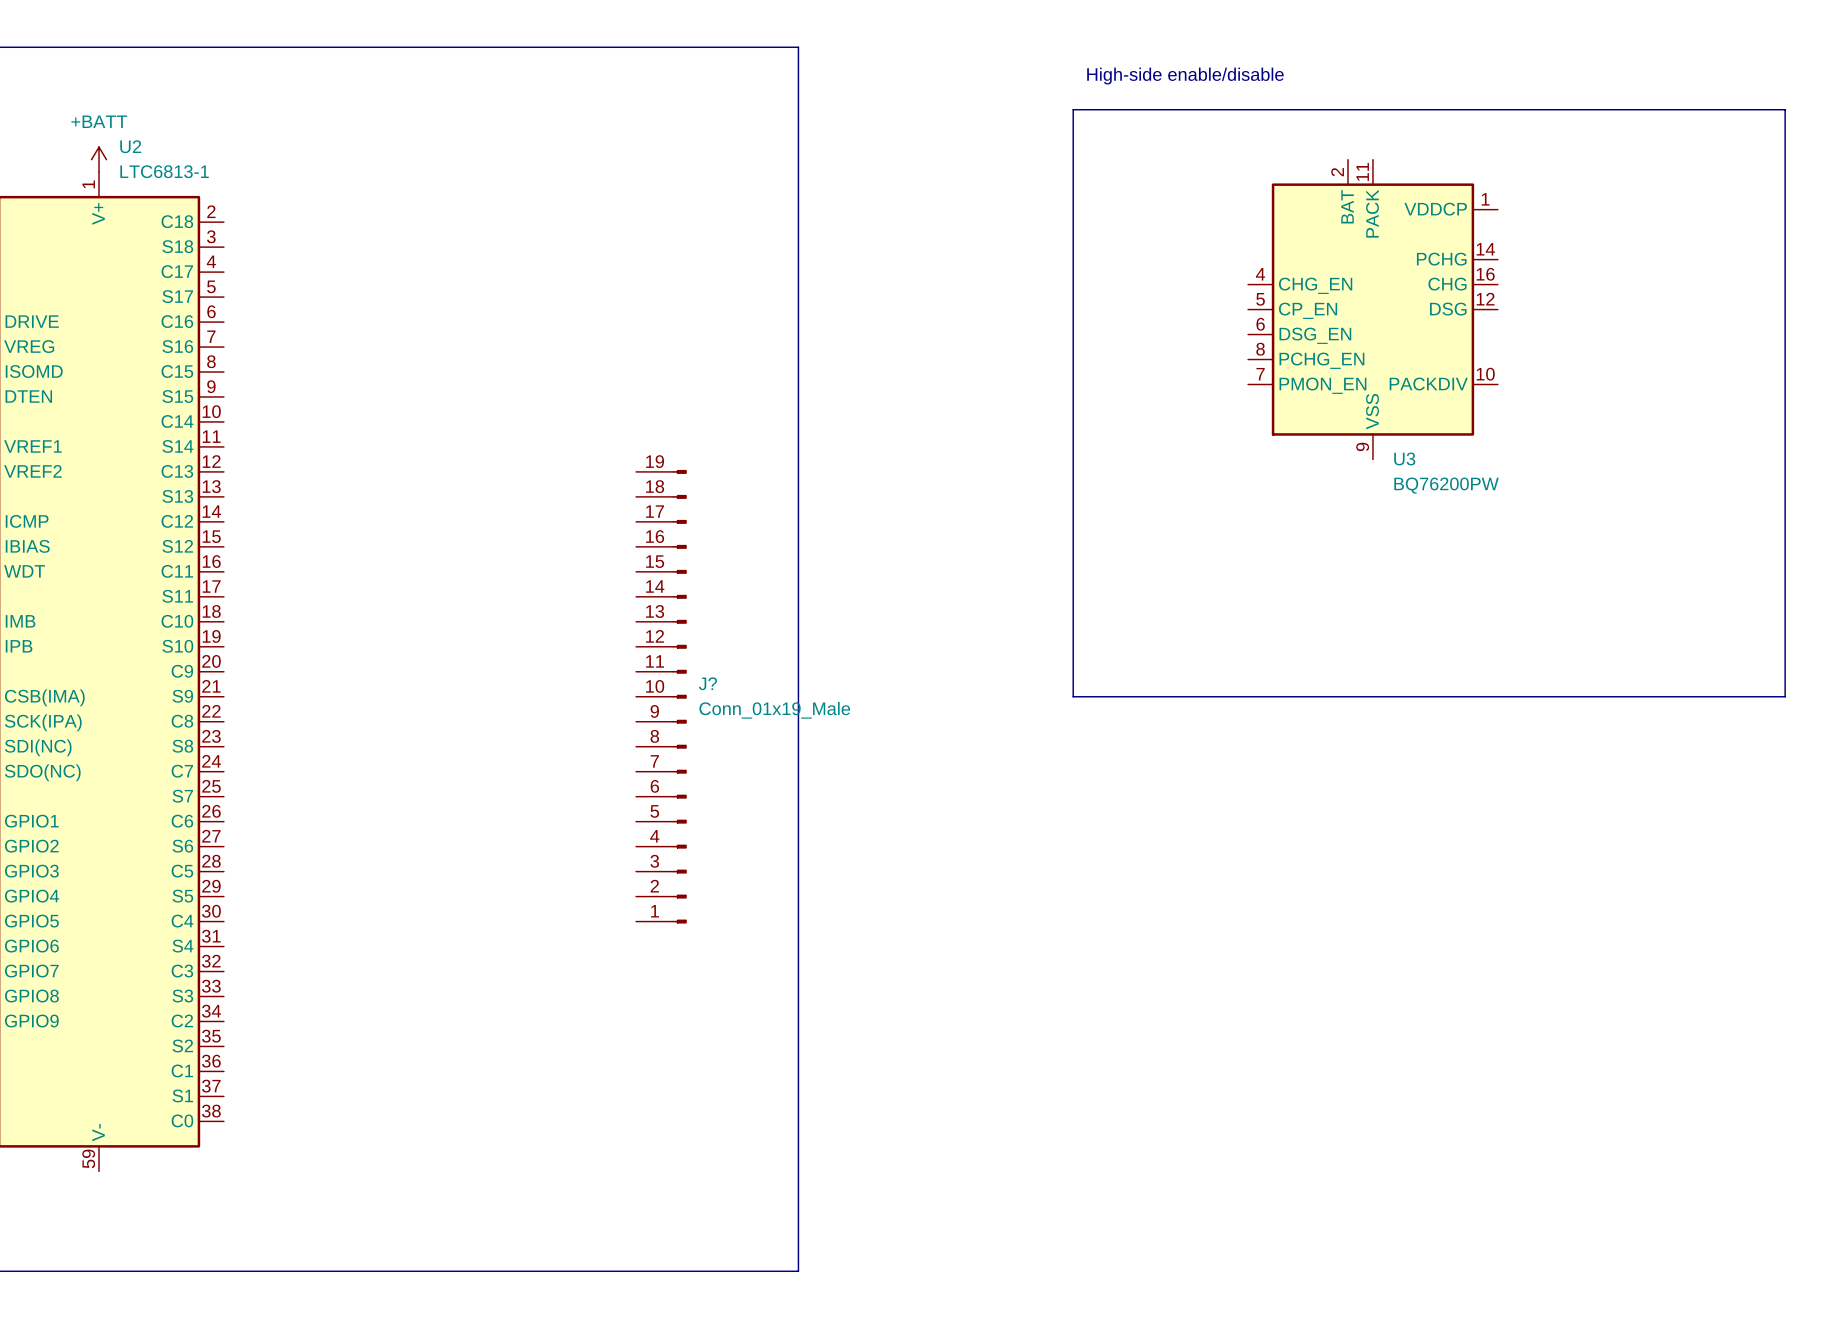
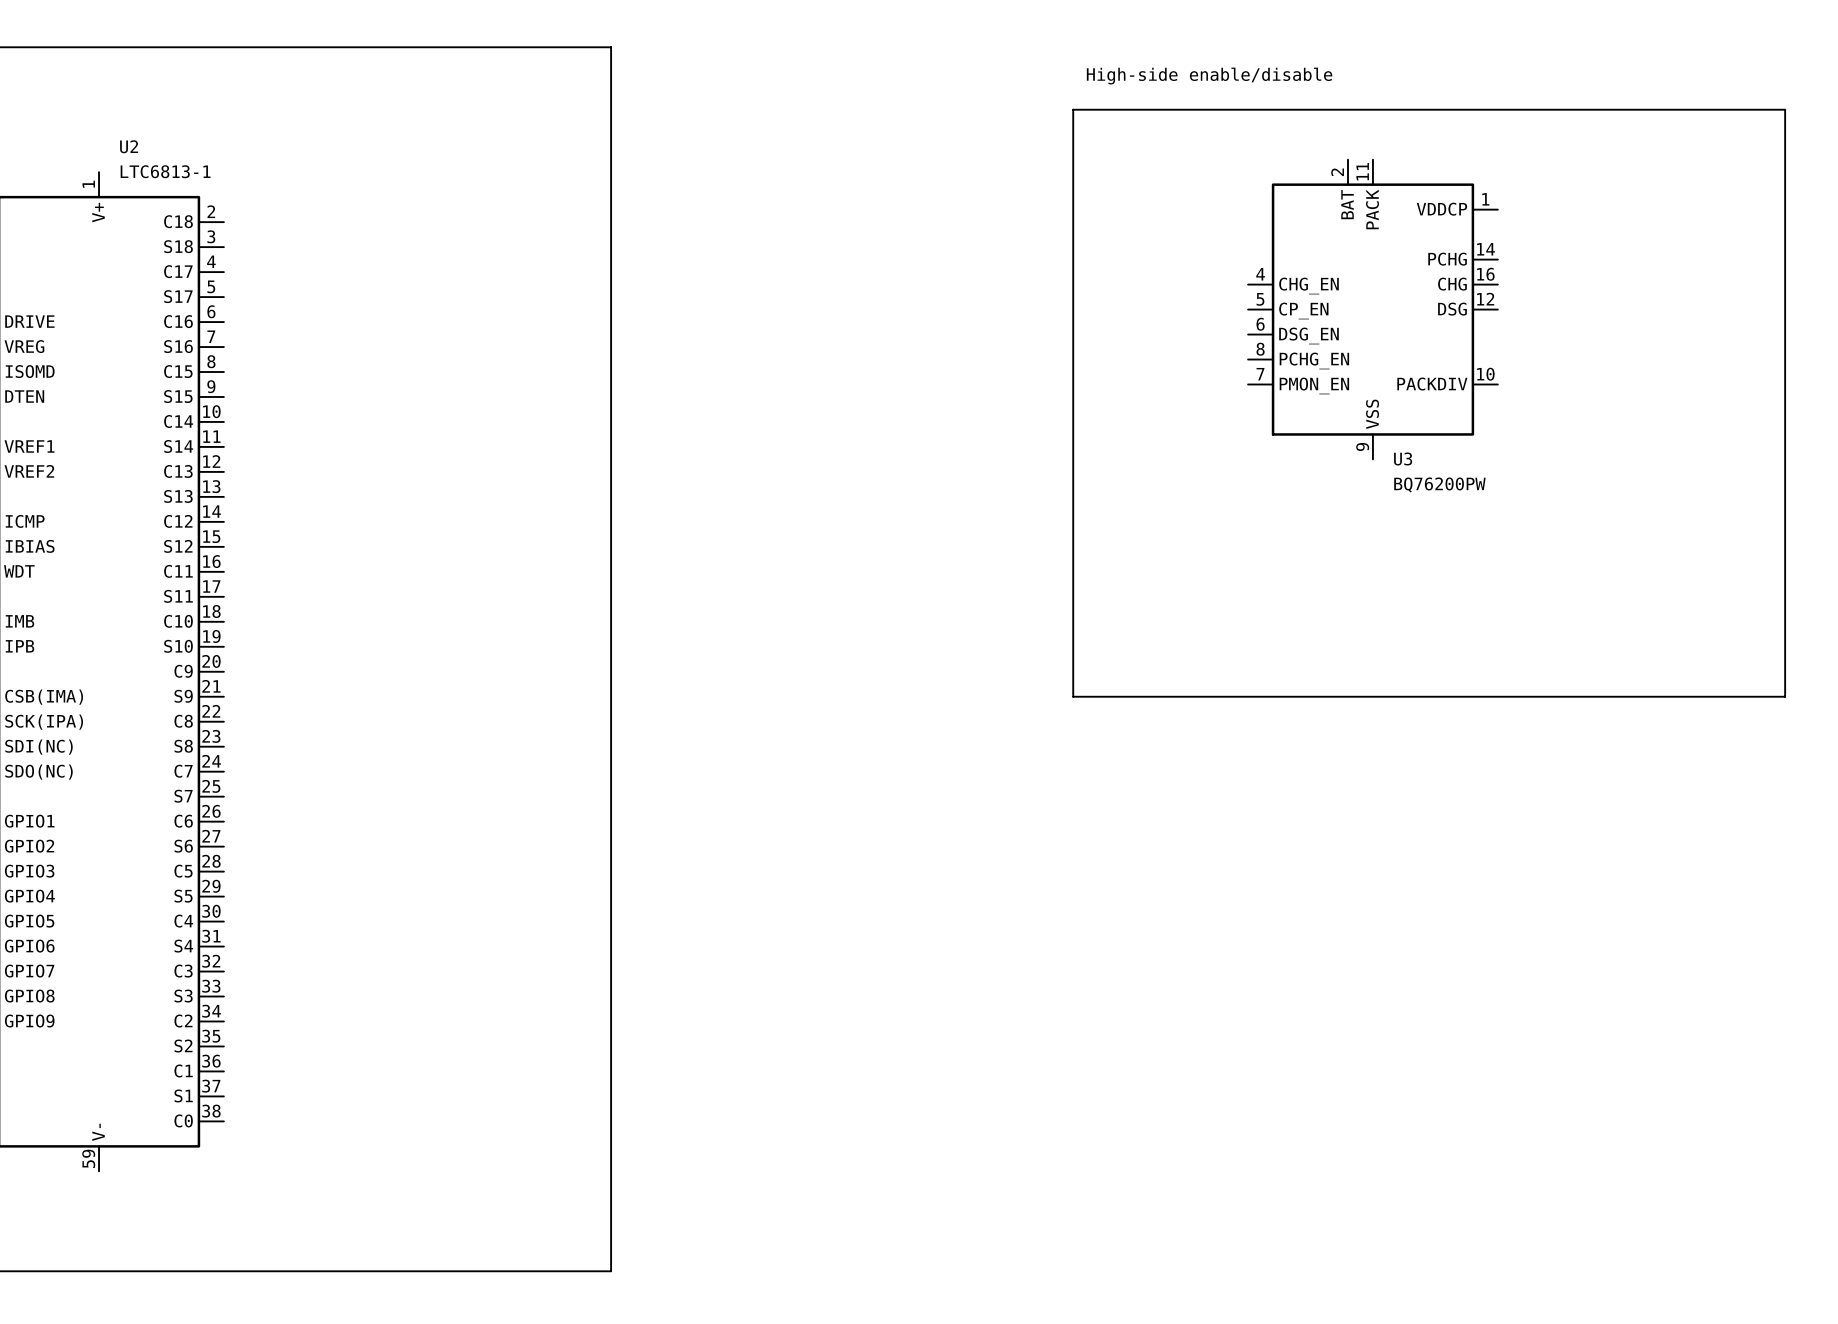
line: (611, 47) (798, 47) (798, 1271) (611, 1271) -> (611, 47) (611, 1271)
power symbol: +BATT (99, 159) -> none
J?: Conn_01x19_Male (661, 696) -> none

